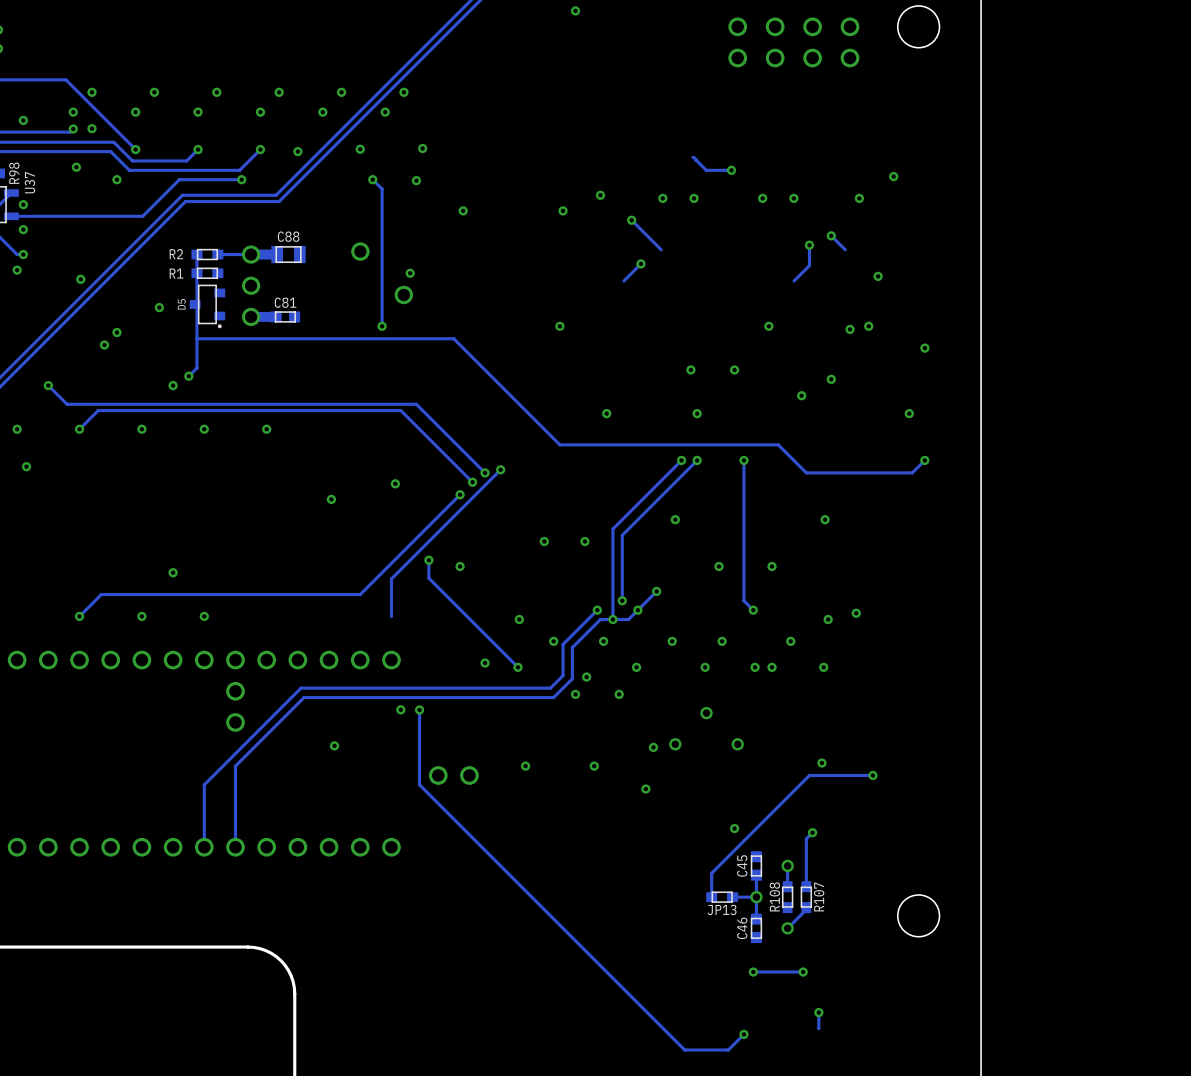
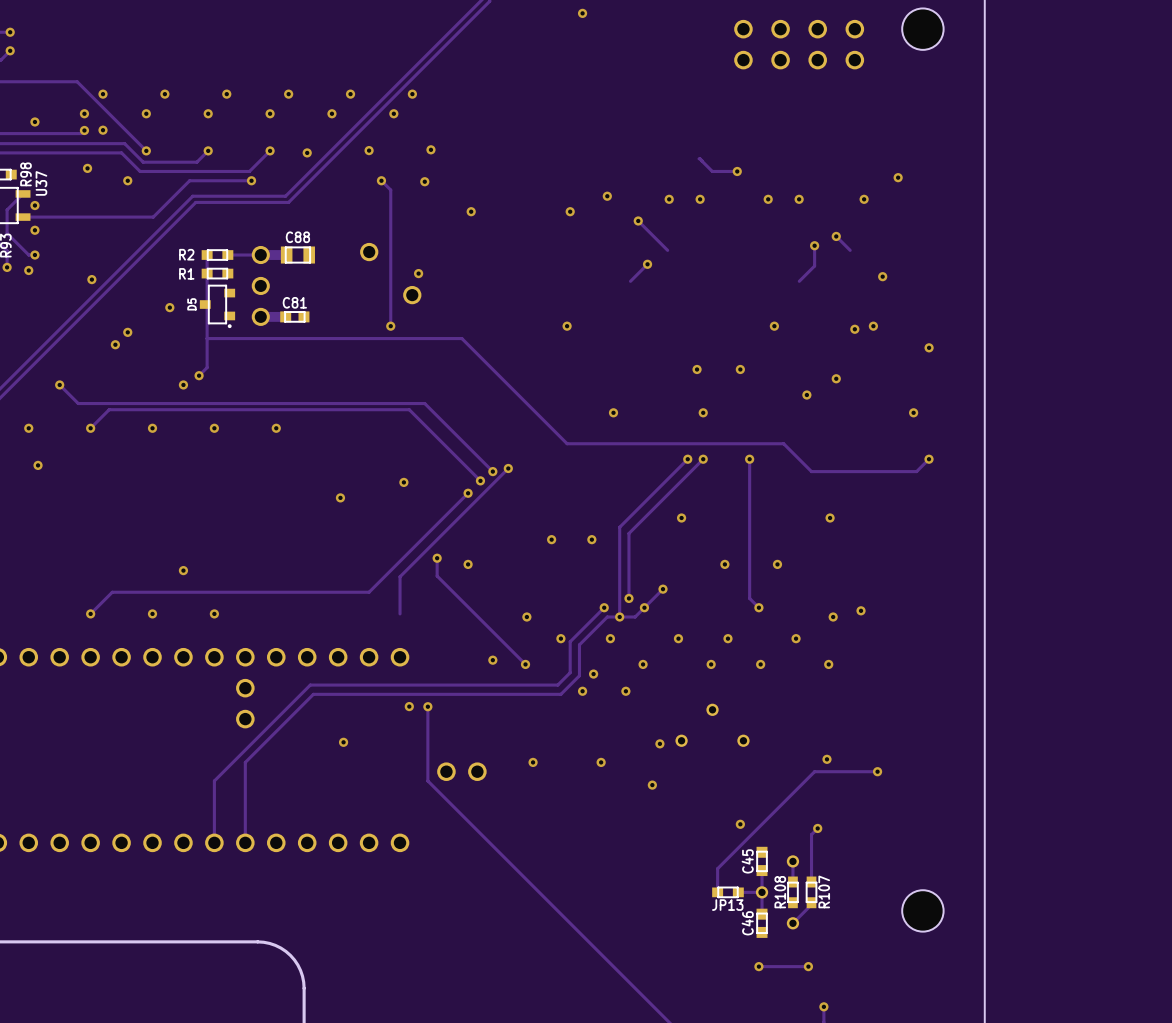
via: (772, 667) -> none

